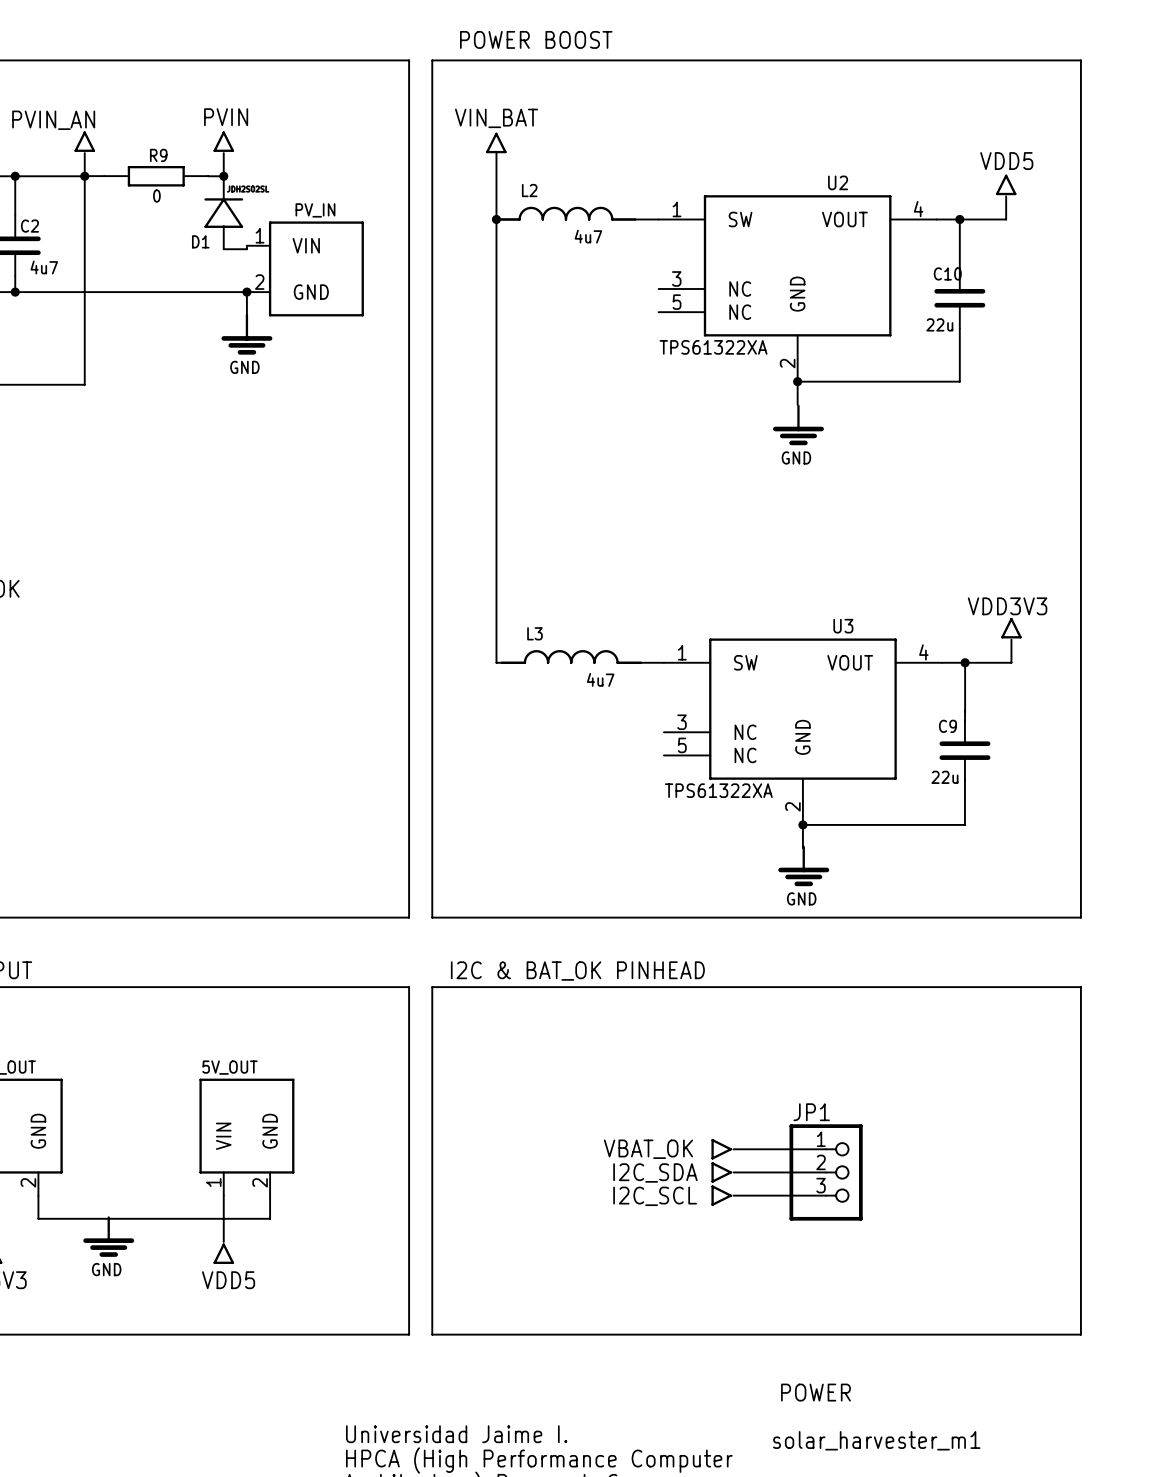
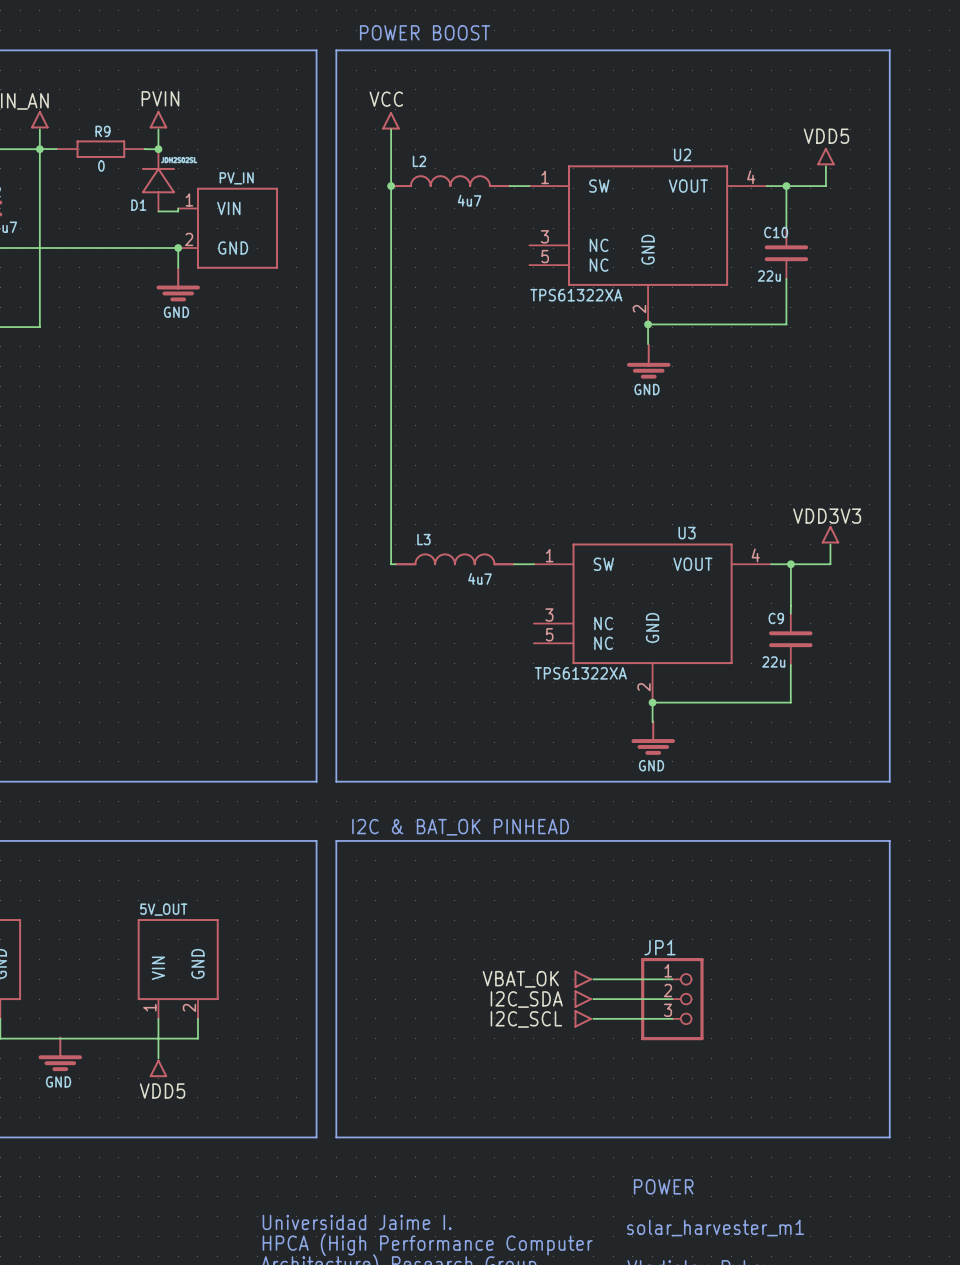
label: none -> VCC (386, 99)
label: VIN_BAT (496, 118) -> none

